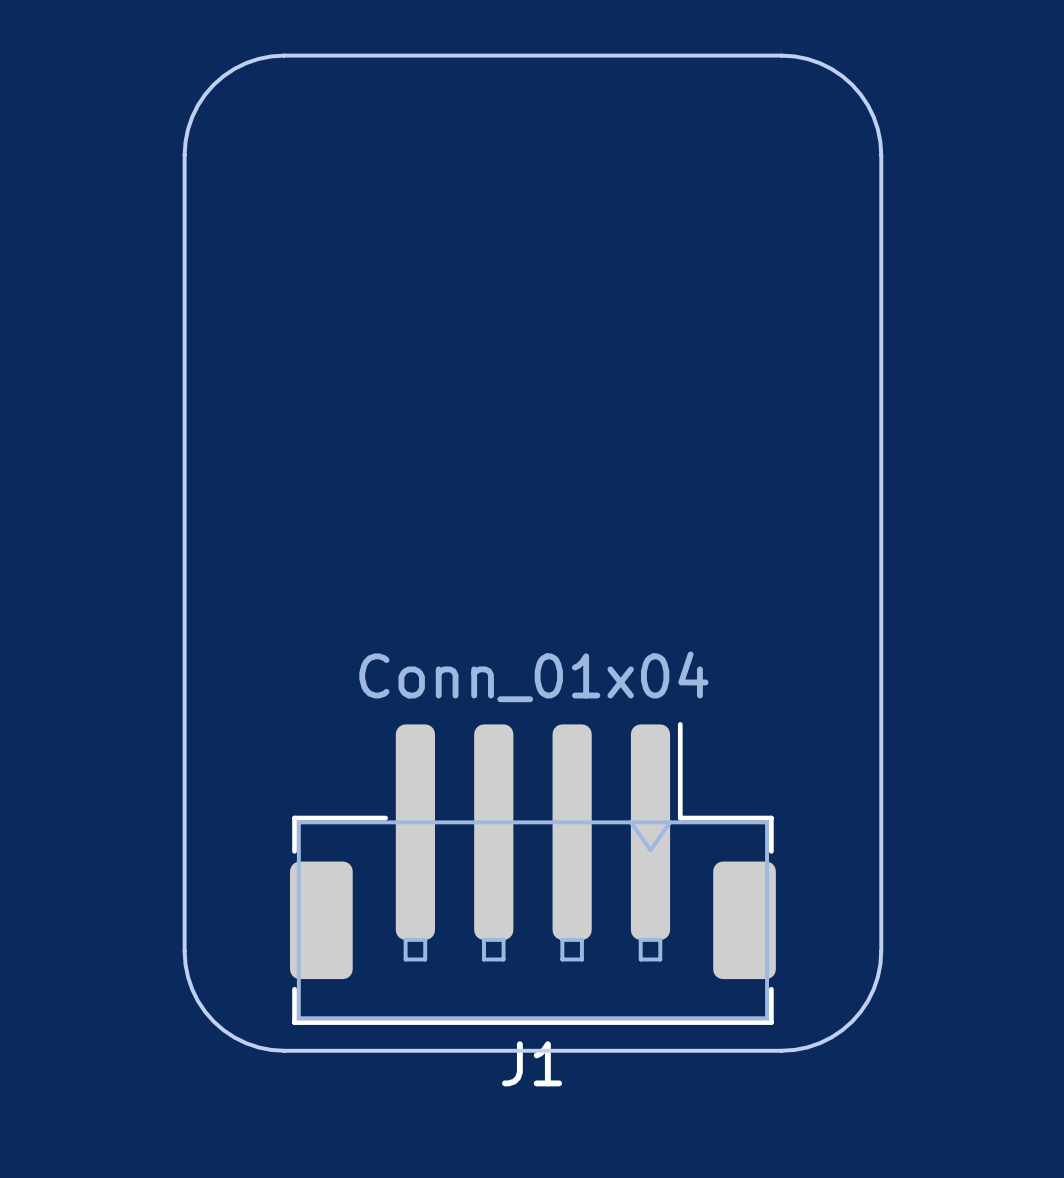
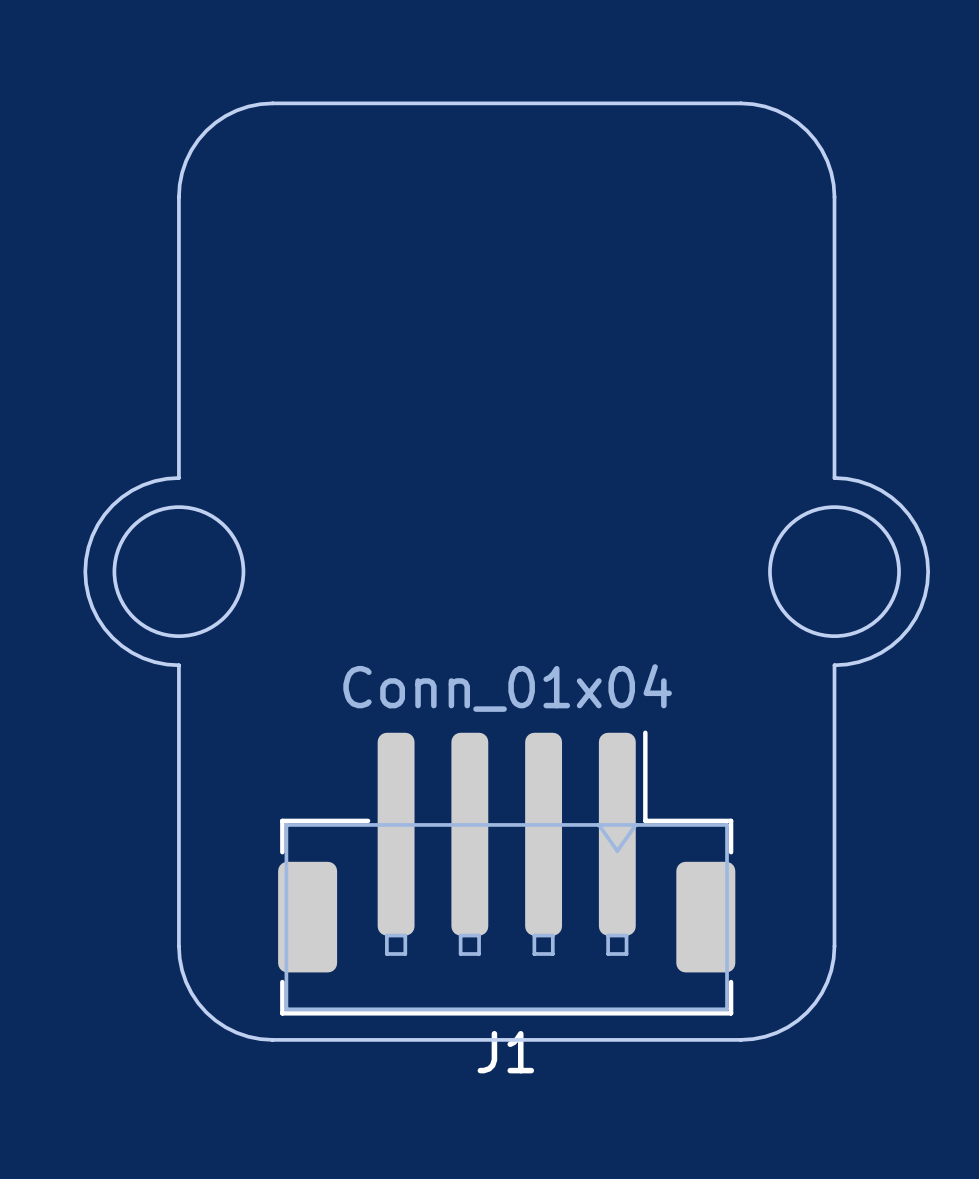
board edge: (184, 453) (184, 652) -> (178, 477) (154, 481) (143, 485) (132, 490) (112, 505) (104, 514) (92, 535) (88, 547) (85, 571) (88, 595) (92, 607) (104, 628) (112, 637) (132, 652) (143, 658) (154, 662) (178, 665)
board edge: (881, 453) (881, 652) -> (834, 477) (858, 481) (870, 485) (881, 490) (900, 505) (908, 514) (921, 535) (924, 547) (928, 571) (924, 595) (921, 607) (908, 628) (900, 637) (881, 652) (870, 658) (858, 662) (834, 665)
round board edge: none -> [112, 505, 246, 639]
round board edge: none -> [768, 505, 901, 639]

